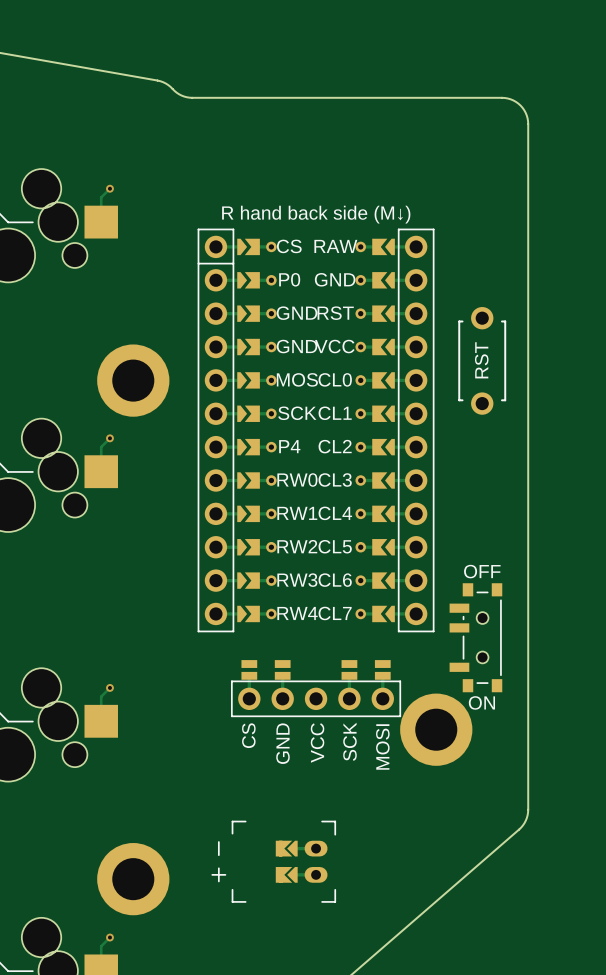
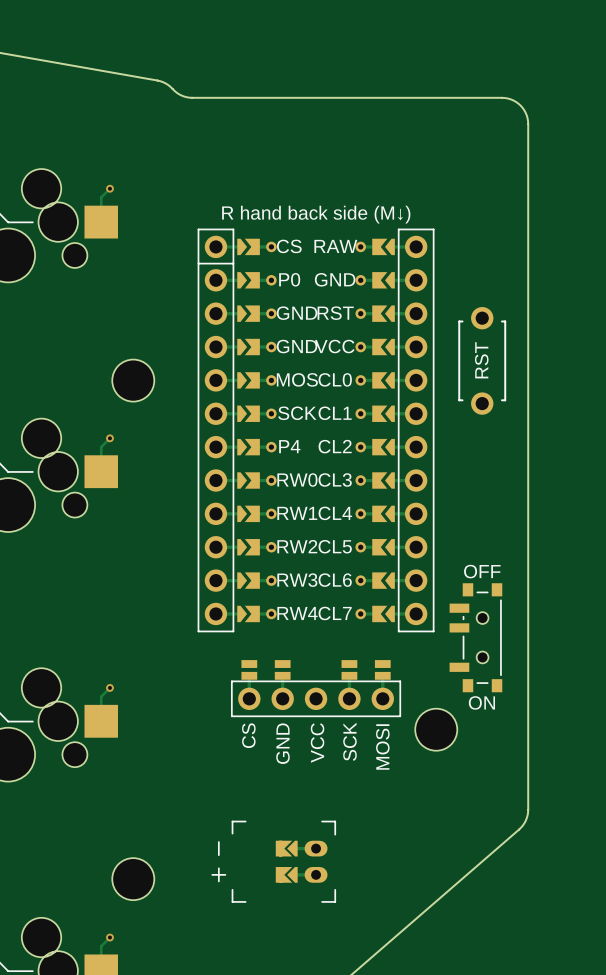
part footprint: [97, 344, 170, 417] -> [112, 359, 155, 402]
part footprint: [400, 693, 473, 766] -> [415, 708, 458, 751]
part footprint: [97, 843, 170, 916] -> [112, 858, 155, 901]

